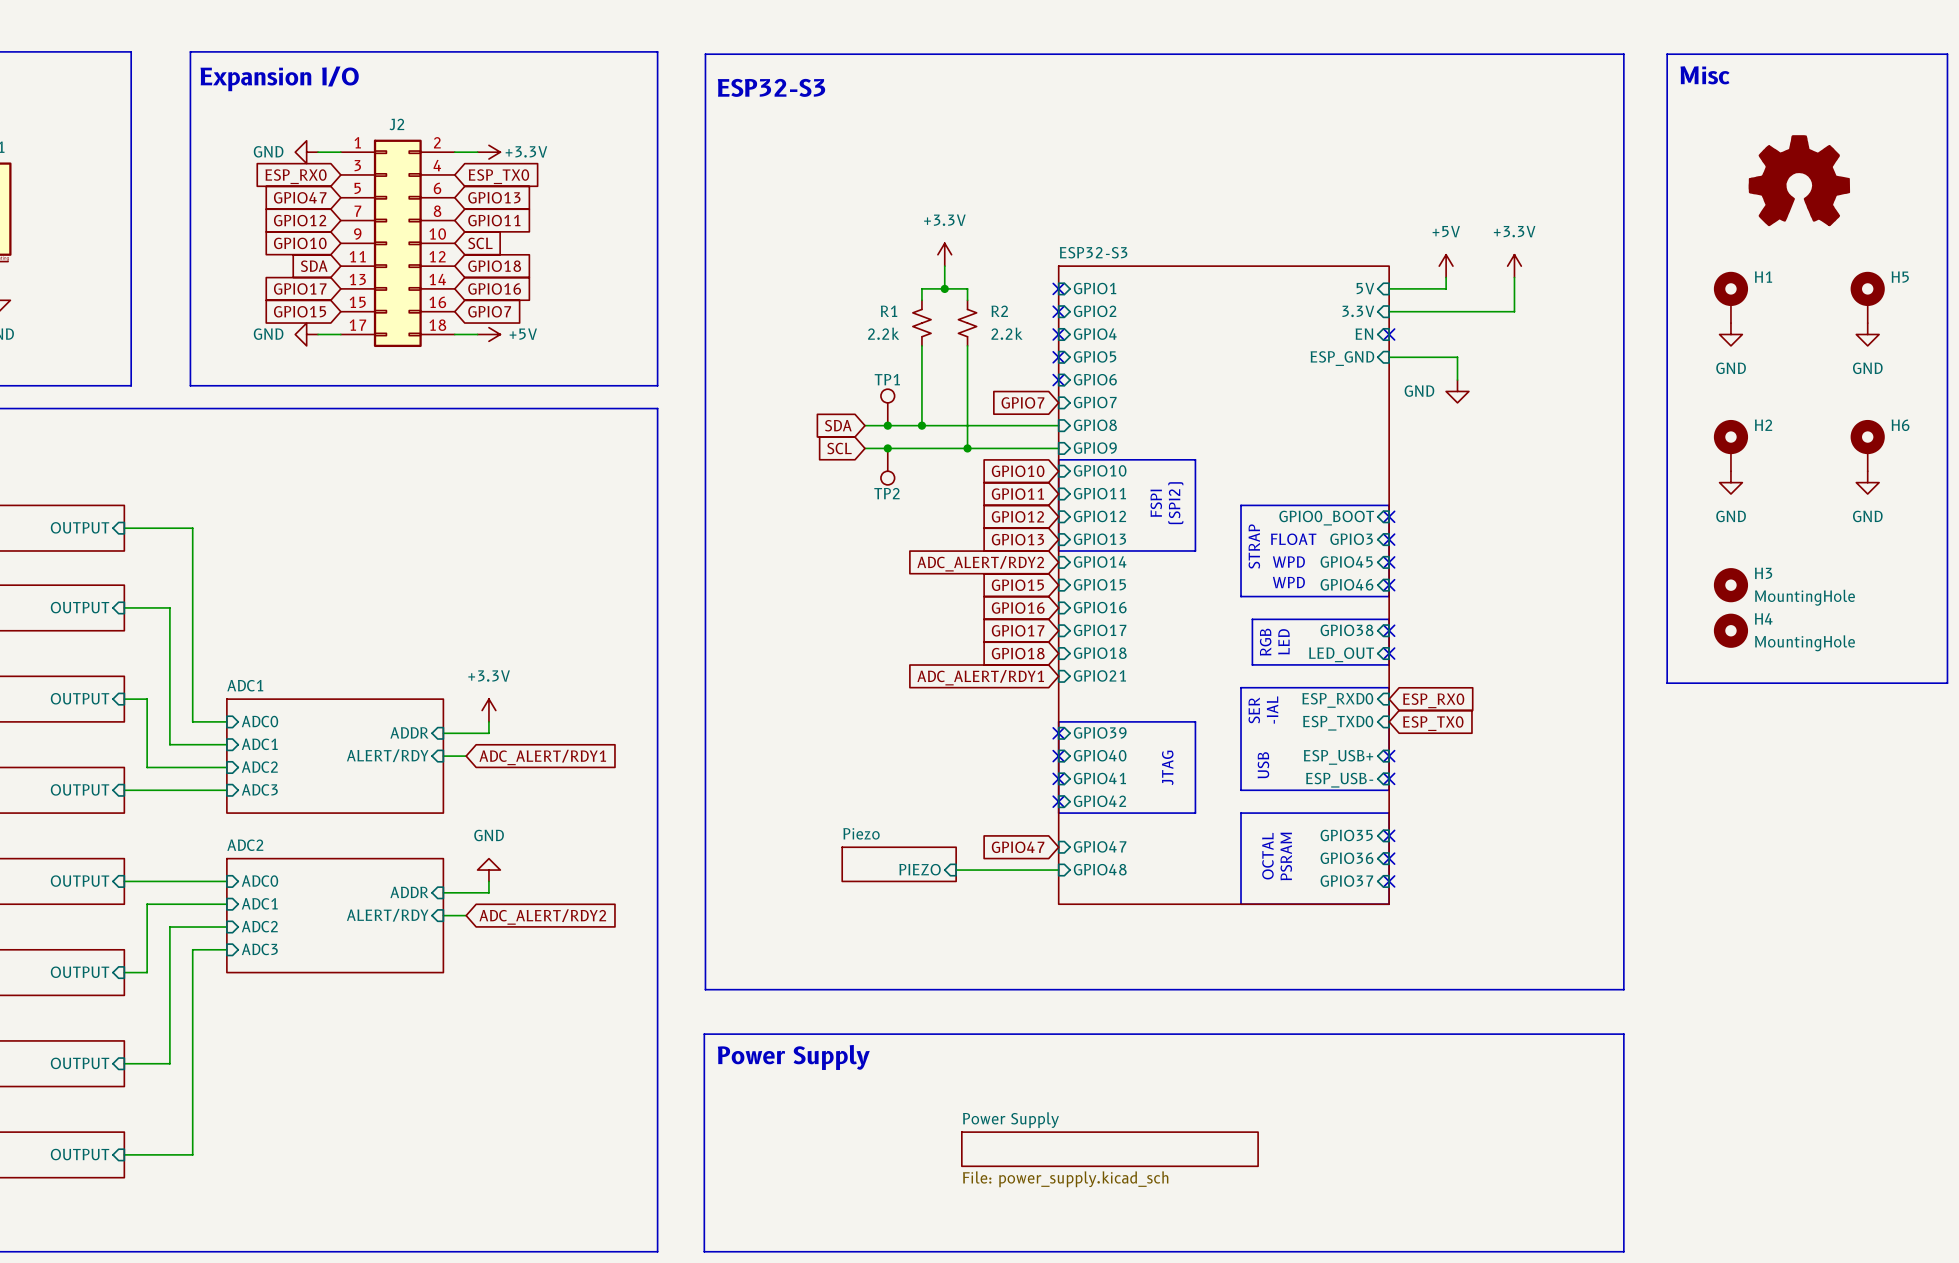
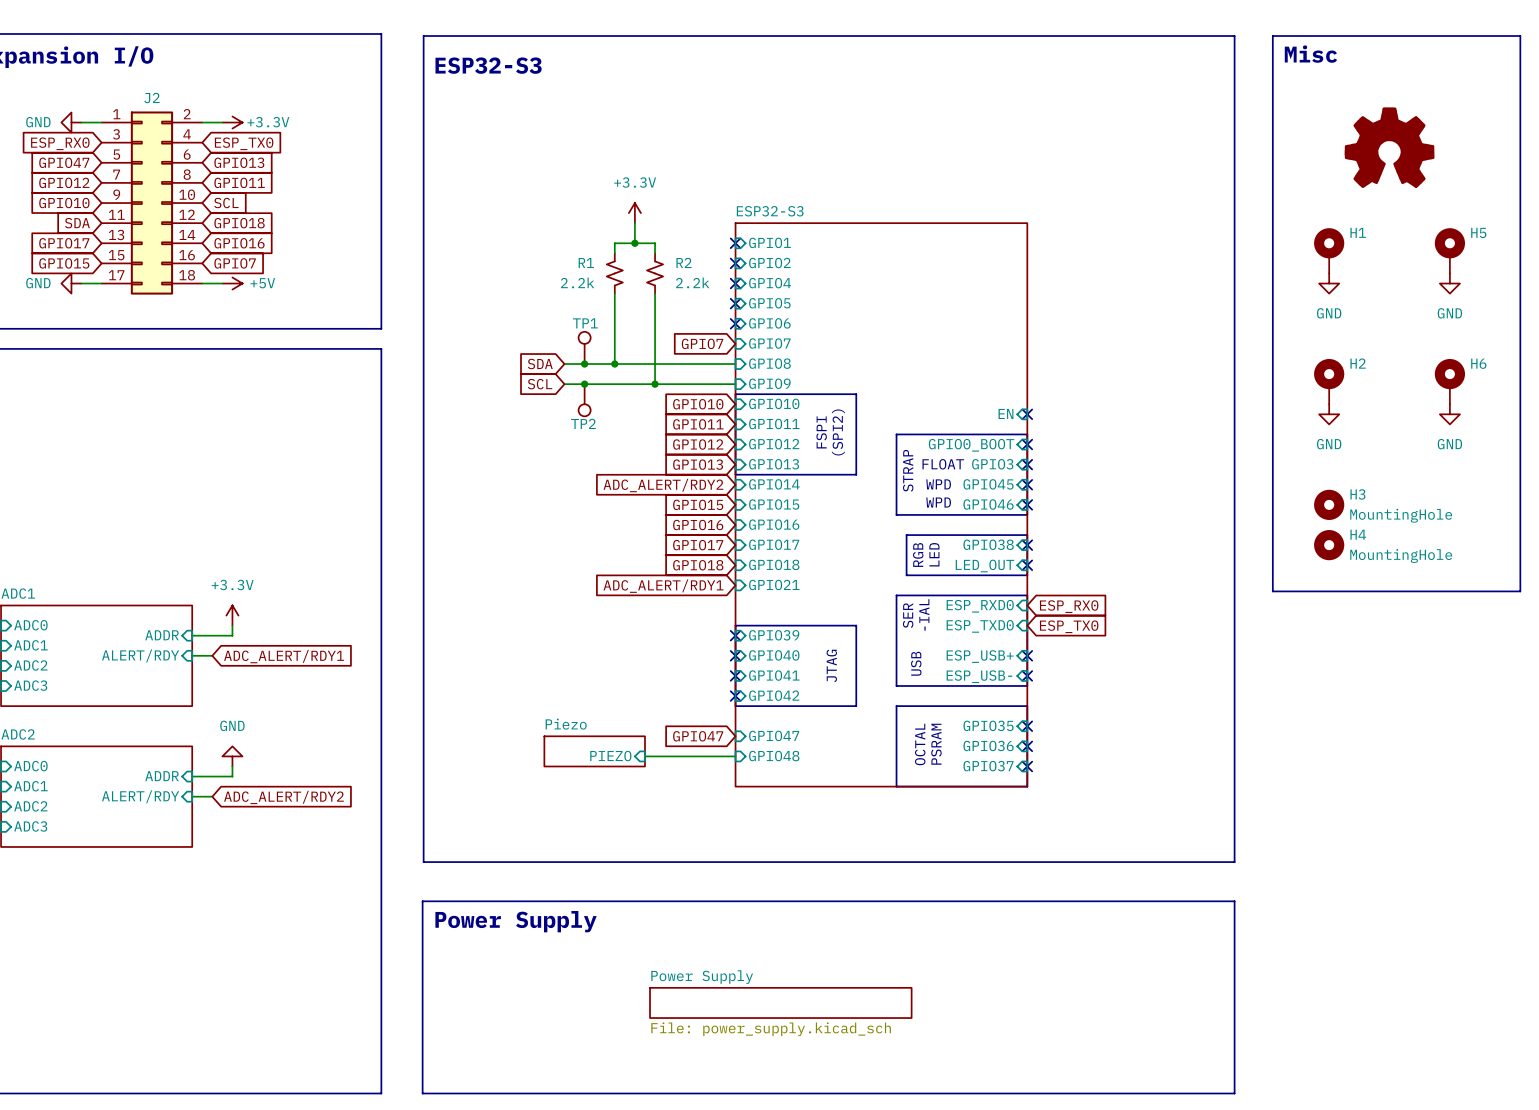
power symbol: +5V (1446, 266) -> none
power symbol: +3.3V (1514, 266) -> none
wire: (1446, 277) (1446, 288) (1389, 288) -> none
wire: (1514, 277) (1514, 311) (1389, 311) -> none
sheet pin: 5V (1365, 288) -> none
sheet pin: 3.3V (1358, 311) -> none
sheet pin position: EN (1364, 334) -> EN (1005, 413)
no-connect mark: (1389, 334) -> none
wire: (1389, 357) (1457, 357) (1457, 380) -> none
sheet pin: ESP_GND (1342, 358) -> none
power symbol: GND (1457, 391) -> none
no-connect mark: none -> (1027, 414)

